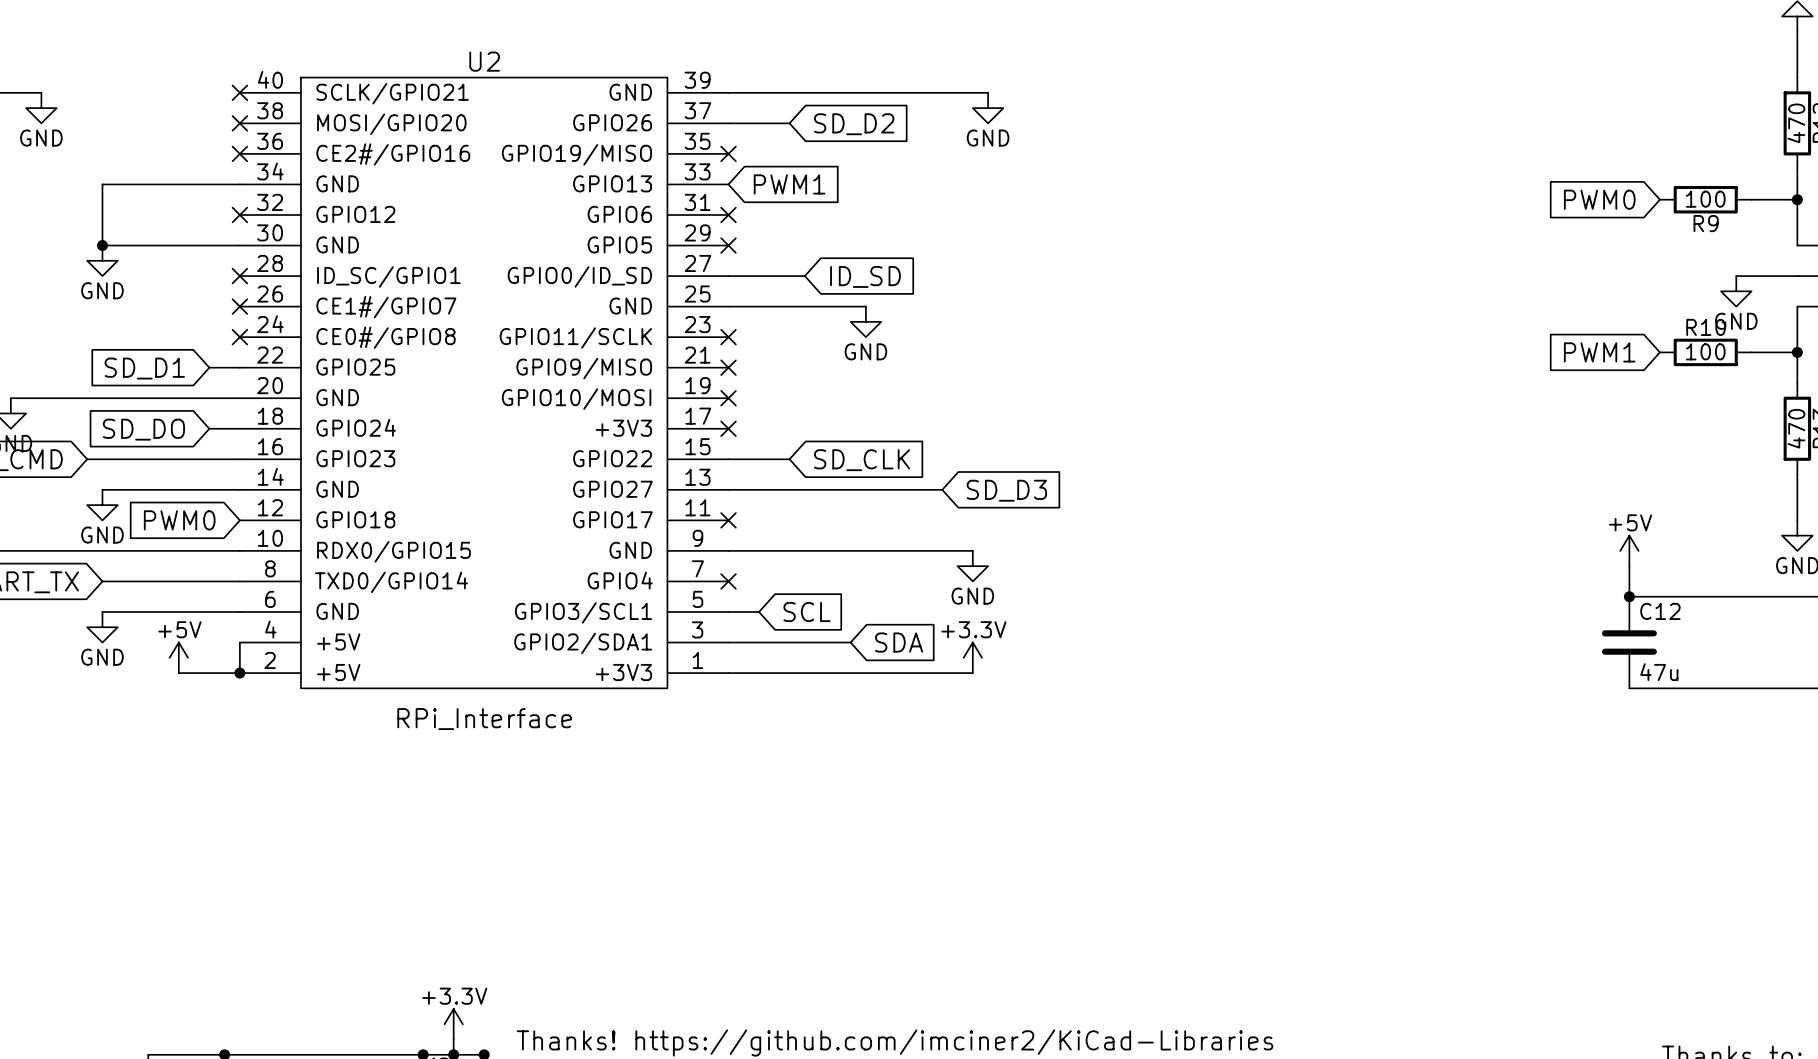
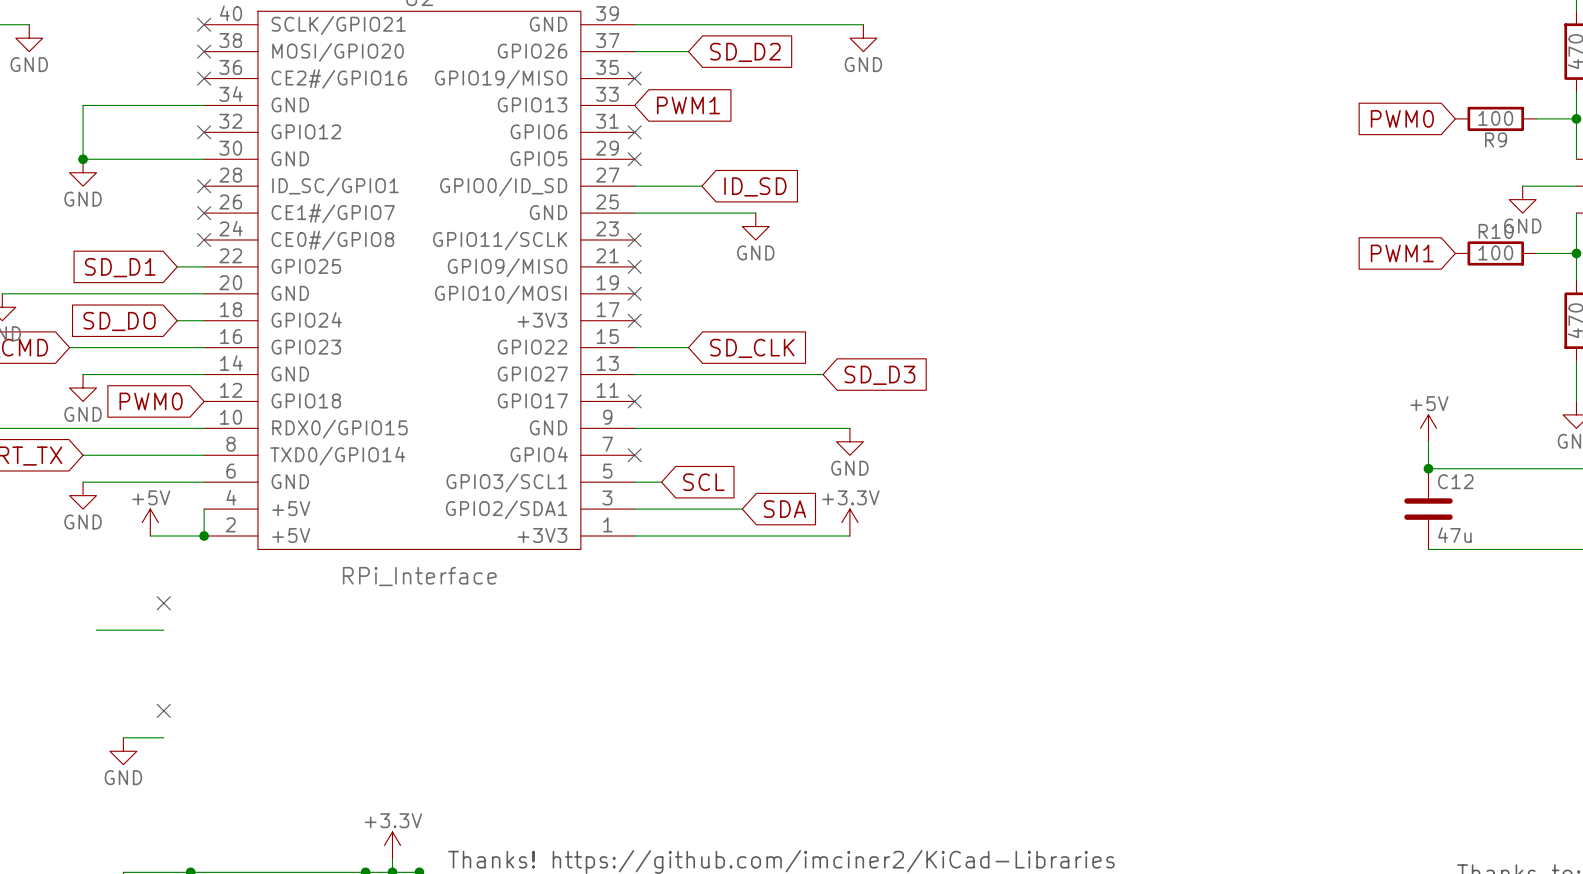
no-connect mark: none -> (163, 603)
wire: none -> (96, 630) (163, 630)
no-connect mark: none -> (163, 710)
wire: none -> (123, 737) (163, 737)
power symbol: none -> GND (123, 751)

